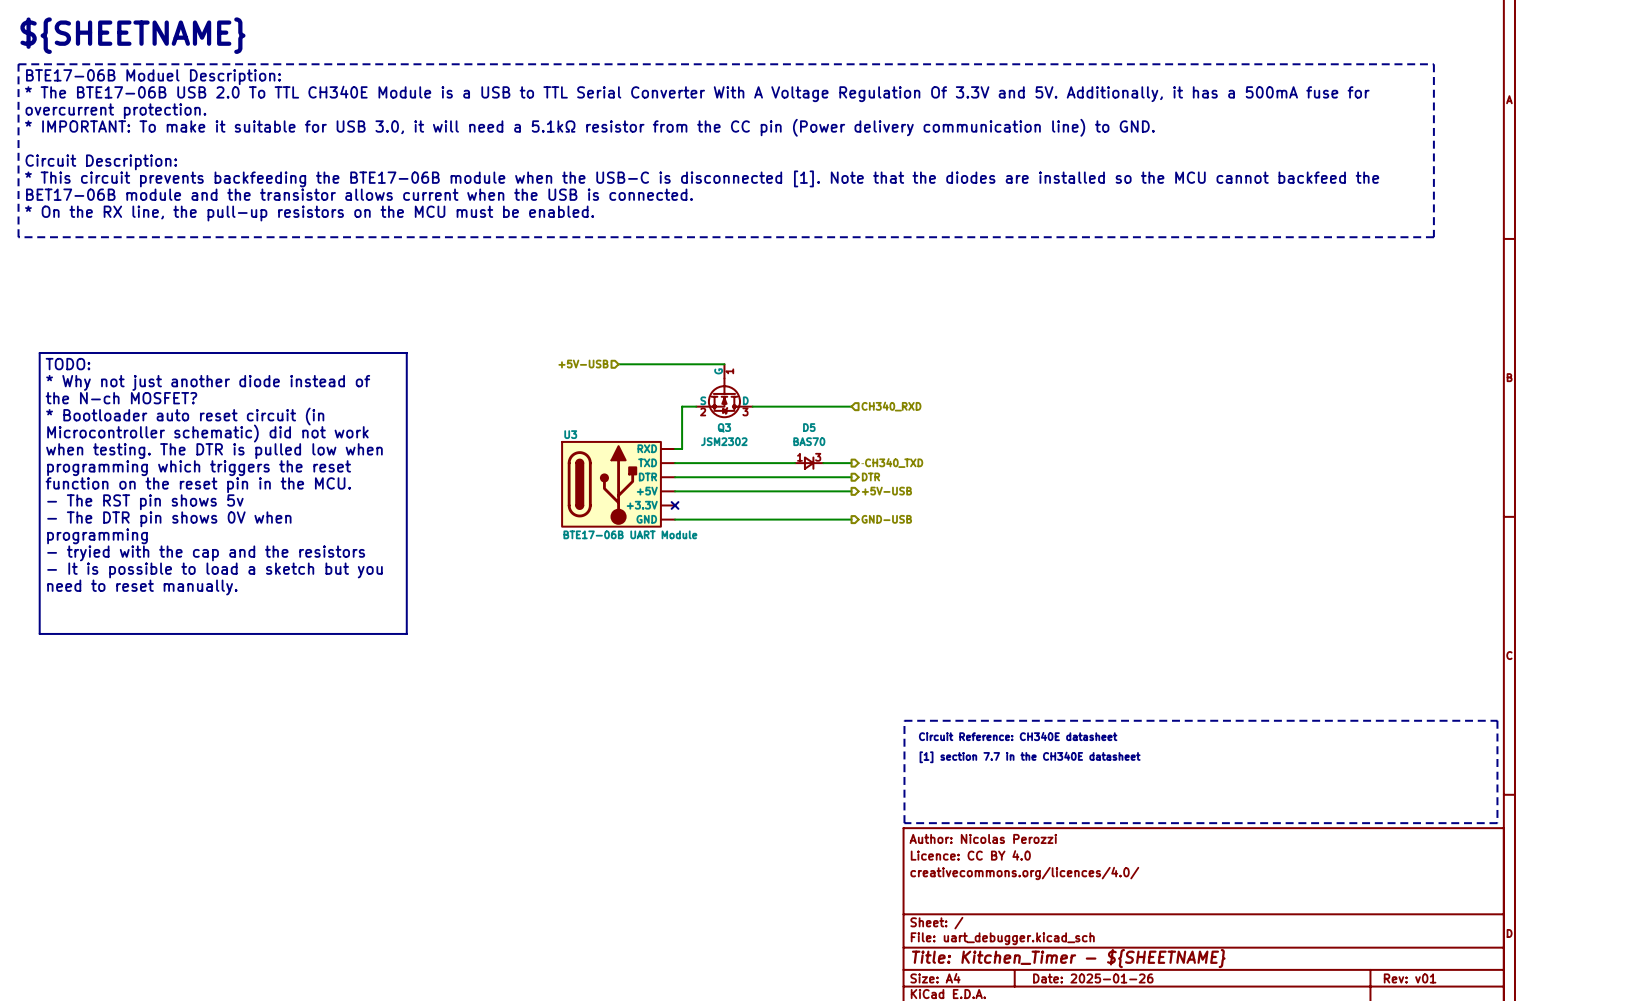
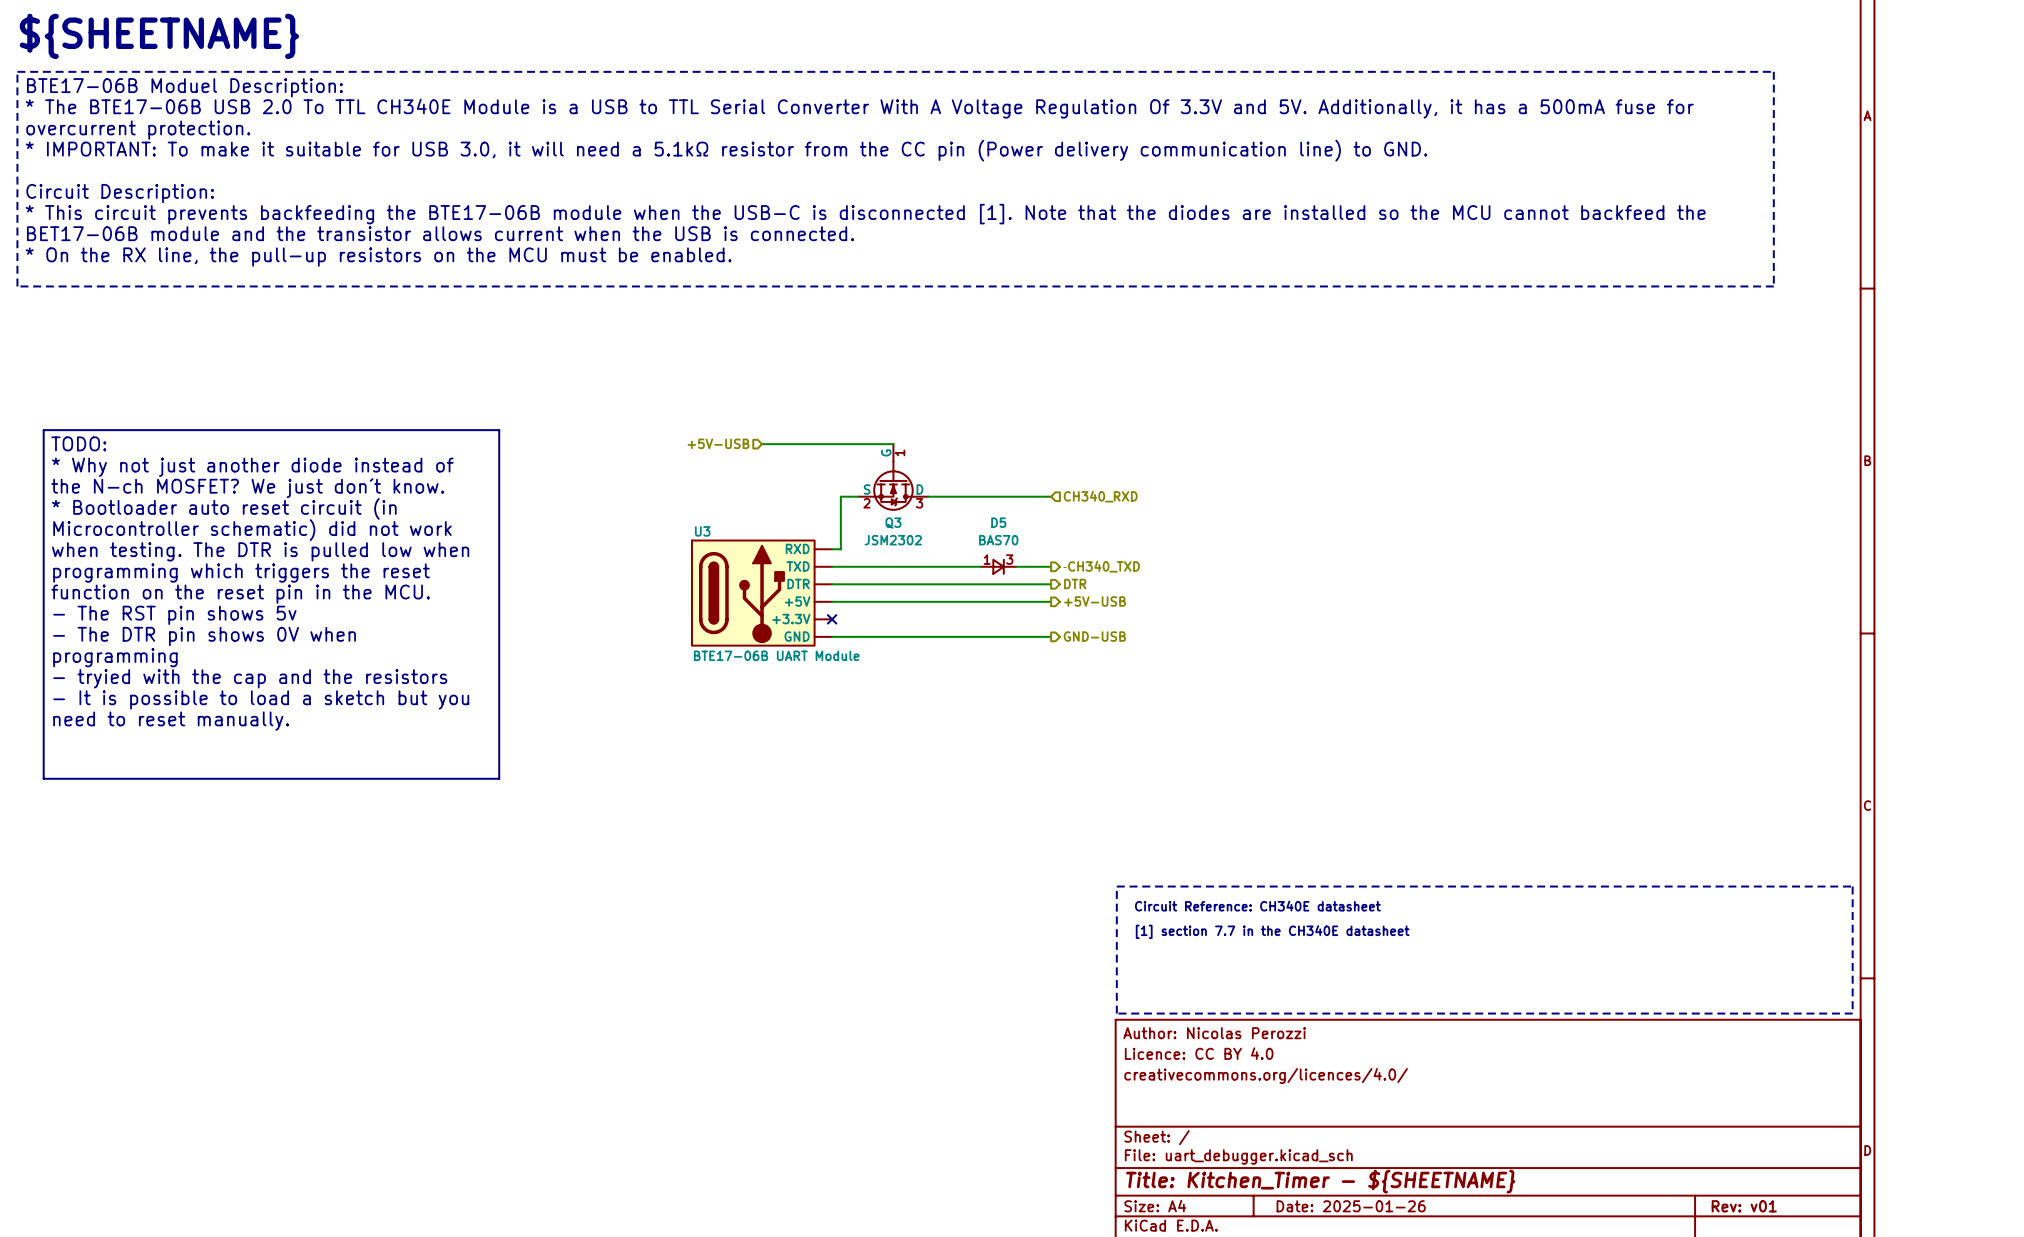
text: the N-ch MOSFET? (121, 398) -> the N-ch MOSFET? We just don´t know. (247, 488)

